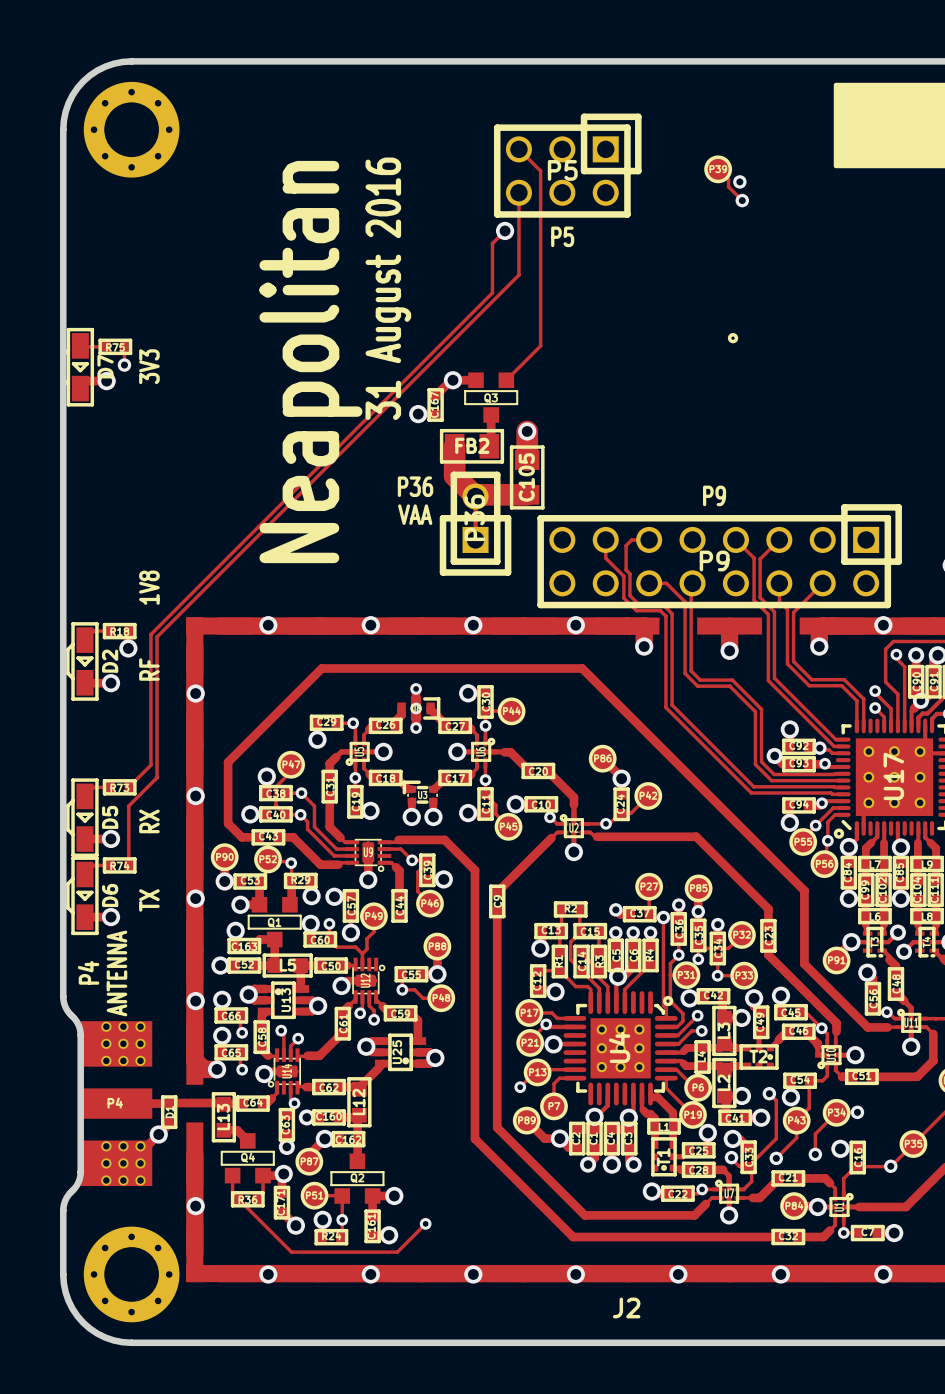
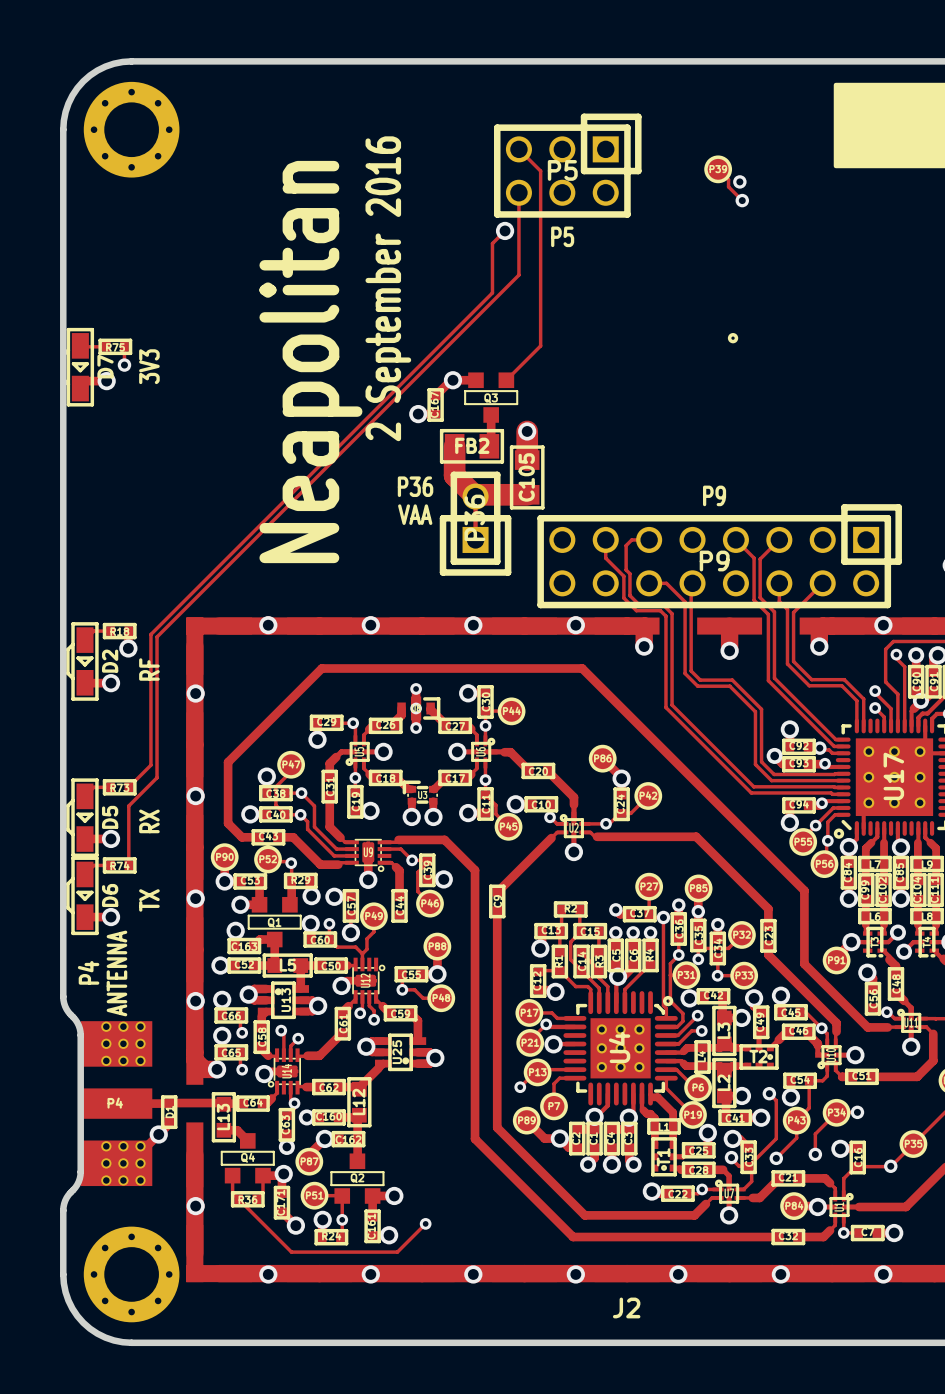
text: 31 August 2016 (388, 288) -> 2 September 2016 (388, 288)
text: 1V8 (149, 587) -> none

